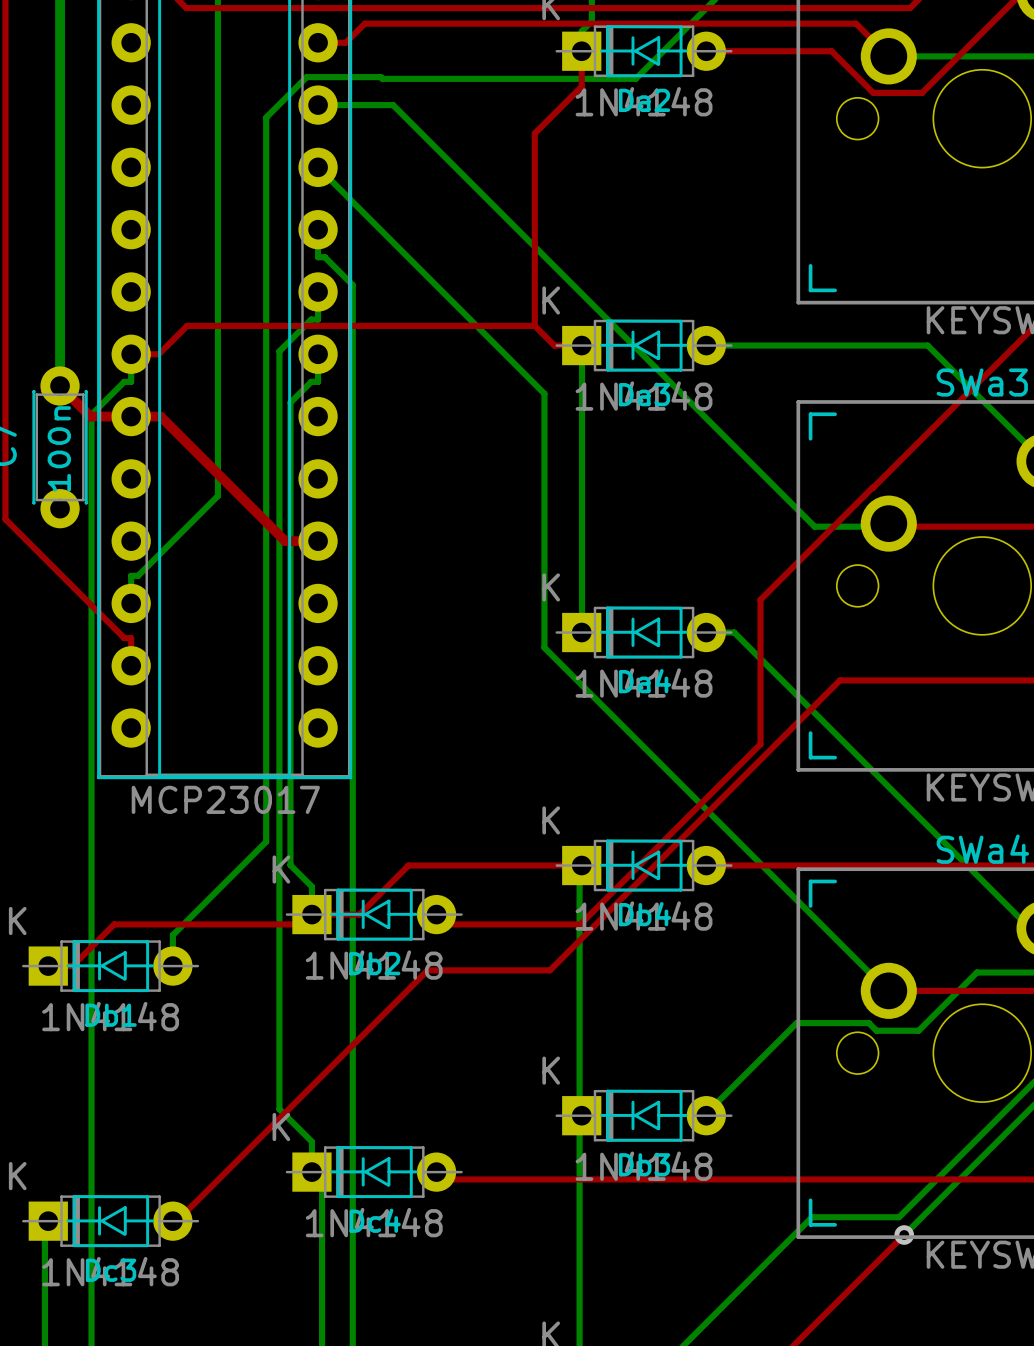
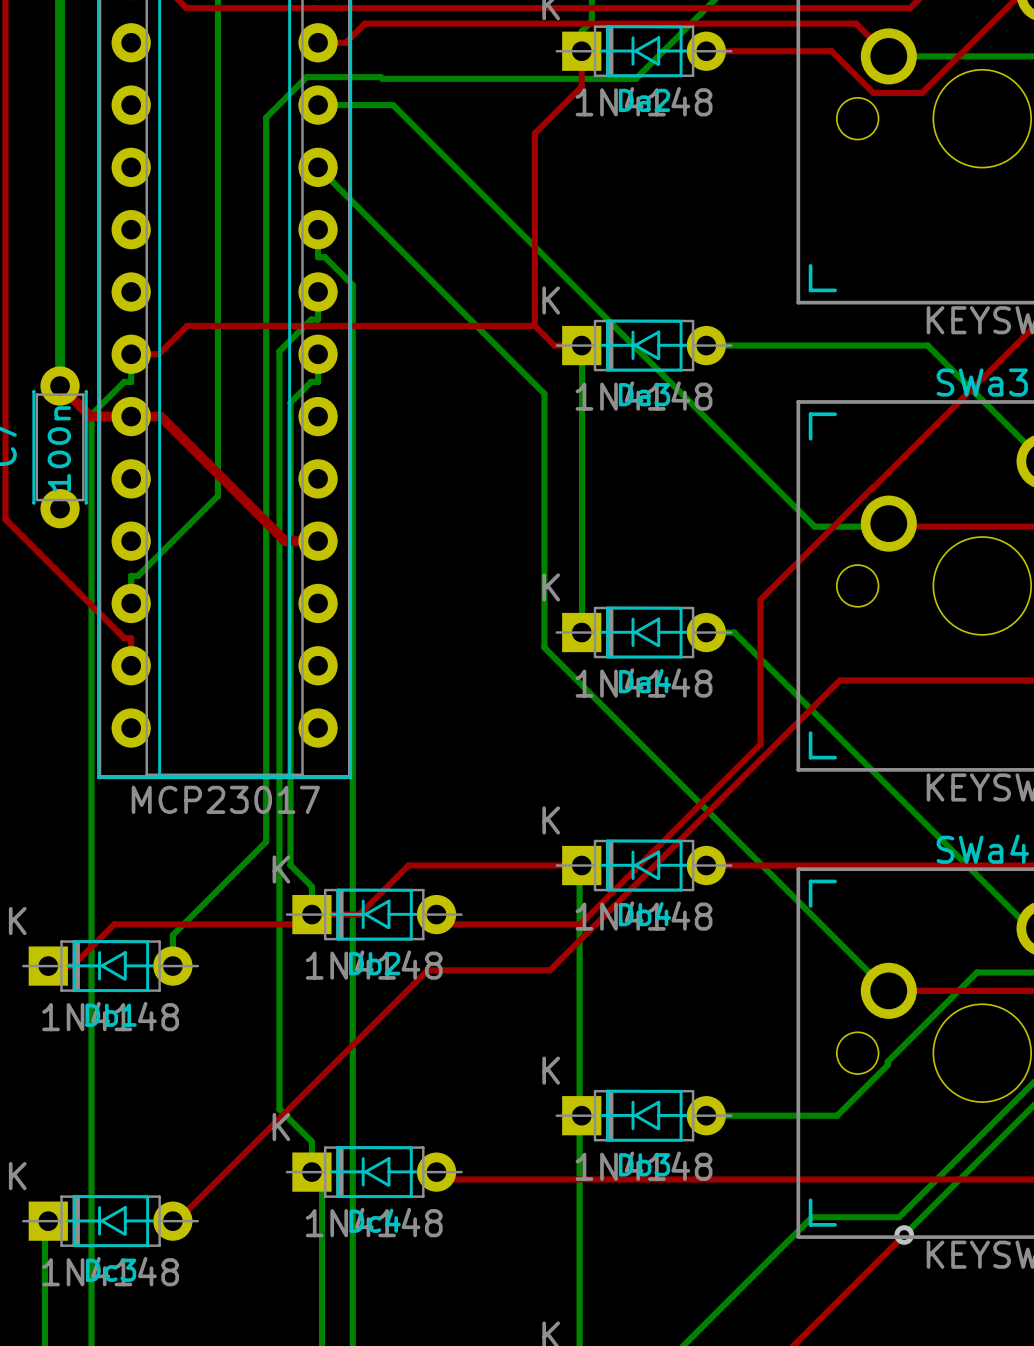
bottom track: (918, 1030) (876, 1030) (868, 1023) (796, 1023) (706, 1115) -> (918, 1030) (837, 1115) (706, 1115)

